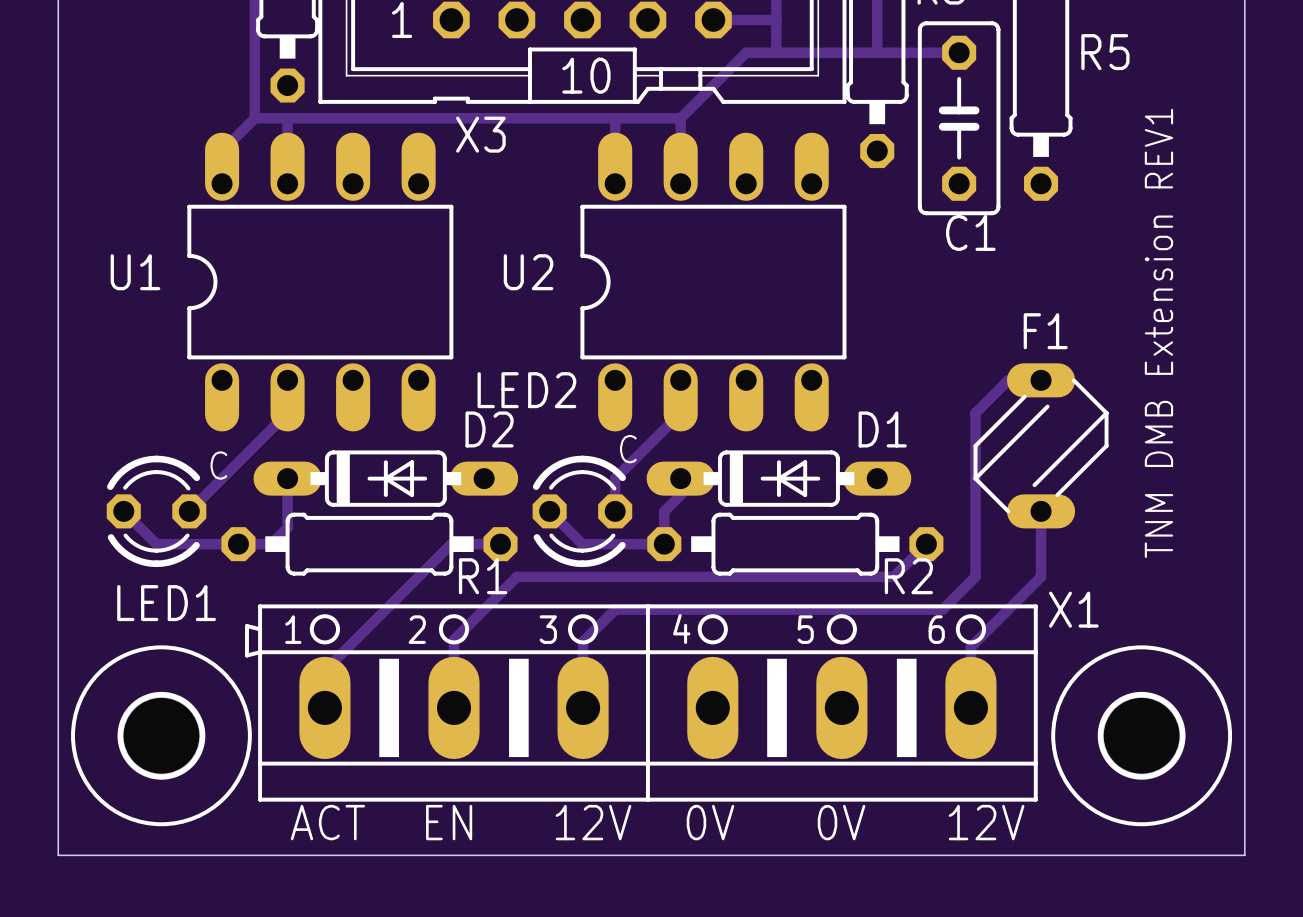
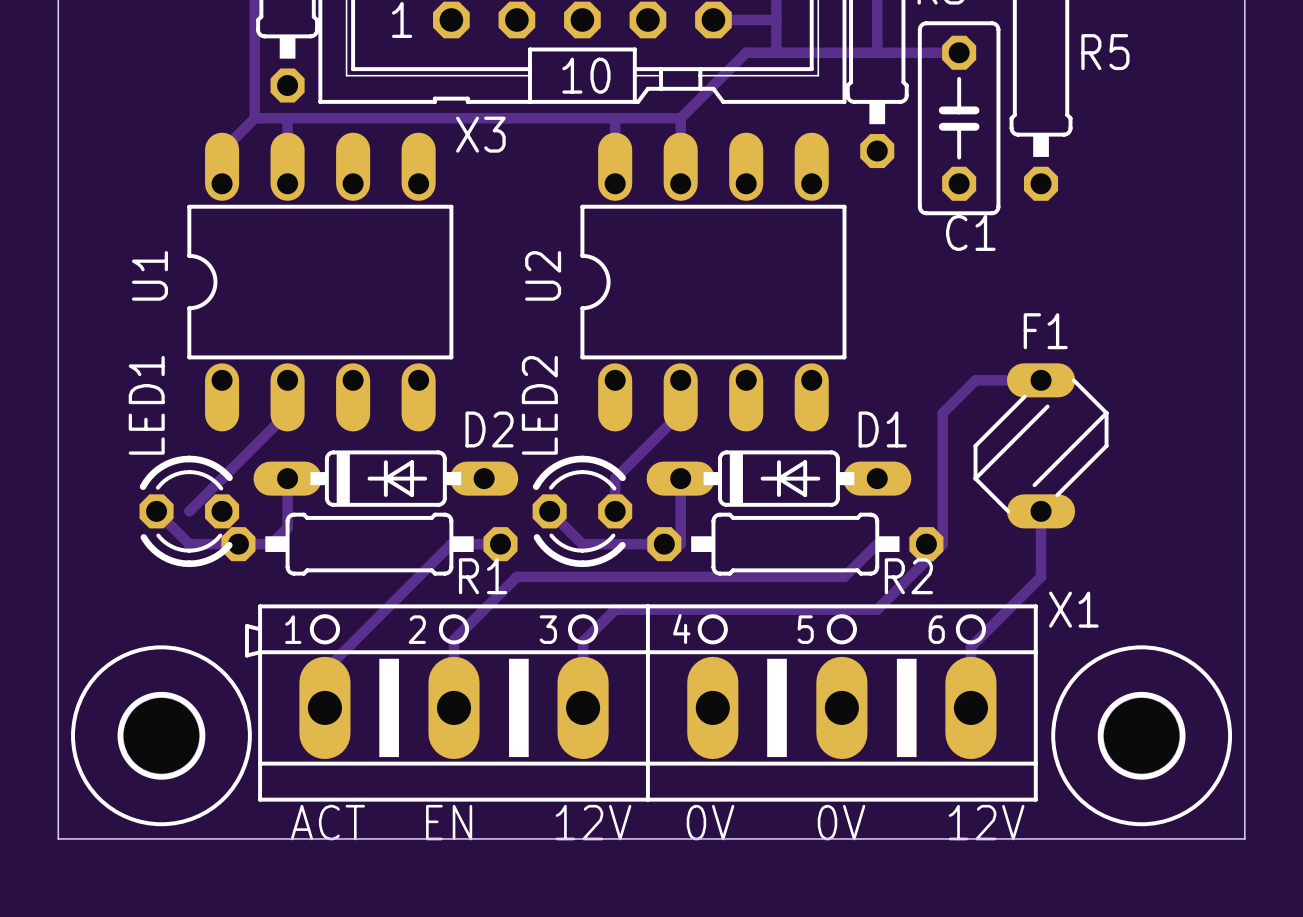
U1 name rotation: 0° (135, 272) -> 90° counterclockwise (150, 275)
U2 name rotation: 0° (528, 272) -> 90° counterclockwise (543, 275)
text: TNM DMB Extension REV1 (1158, 333) -> none
track: (1008, 380) (975, 413) (975, 576) (942, 609) (877, 609) -> (1008, 380) (975, 380) (942, 413) (942, 544) (877, 609)
LED2 name rotation: 0° (526, 390) -> 90° counterclockwise (539, 405)
text: C (628, 449) -> none
text: C (218, 465) -> none
track: (680, 495) (664, 511) (664, 544) -> (680, 495) (680, 544) (664, 544)
track: (123, 511) (156, 544) (189, 544) -> (156, 511) (189, 544)
LED1 position: (156, 511) -> (189, 511)
track: (926, 544) (893, 576) (844, 576) -> (877, 544) (844, 576)
LED1 name rotation: 0° (166, 603) -> 90° counterclockwise (146, 405)
LED1 name position: LED1 (166, 603) -> LED1 (146, 405)
board edge: (58, 838) (58, 855) (1244, 855) (1244, 838) -> (58, 838) (1244, 838)

